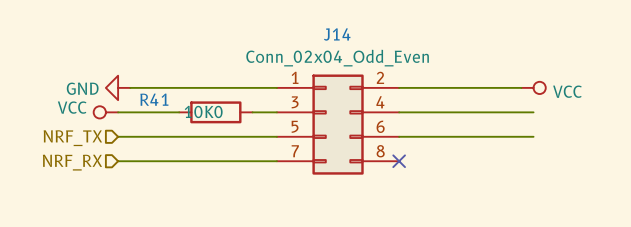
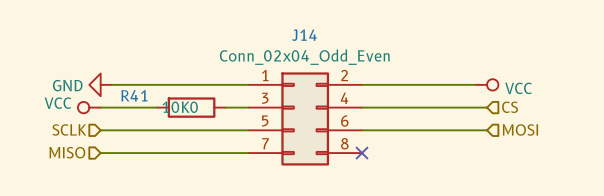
hierarchical label: none -> CS (510, 107)
hierarchical label: none -> MOSI (520, 129)
hierarchical label: NRF_TX (72, 138) -> SCLK (69, 129)
hierarchical label: NRF_RX (72, 162) -> MISO (67, 152)

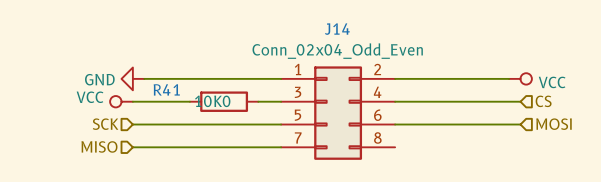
hierarchical label: SCLK (69, 129) -> SCK (105, 124)
no-connect mark: (362, 153) -> none

